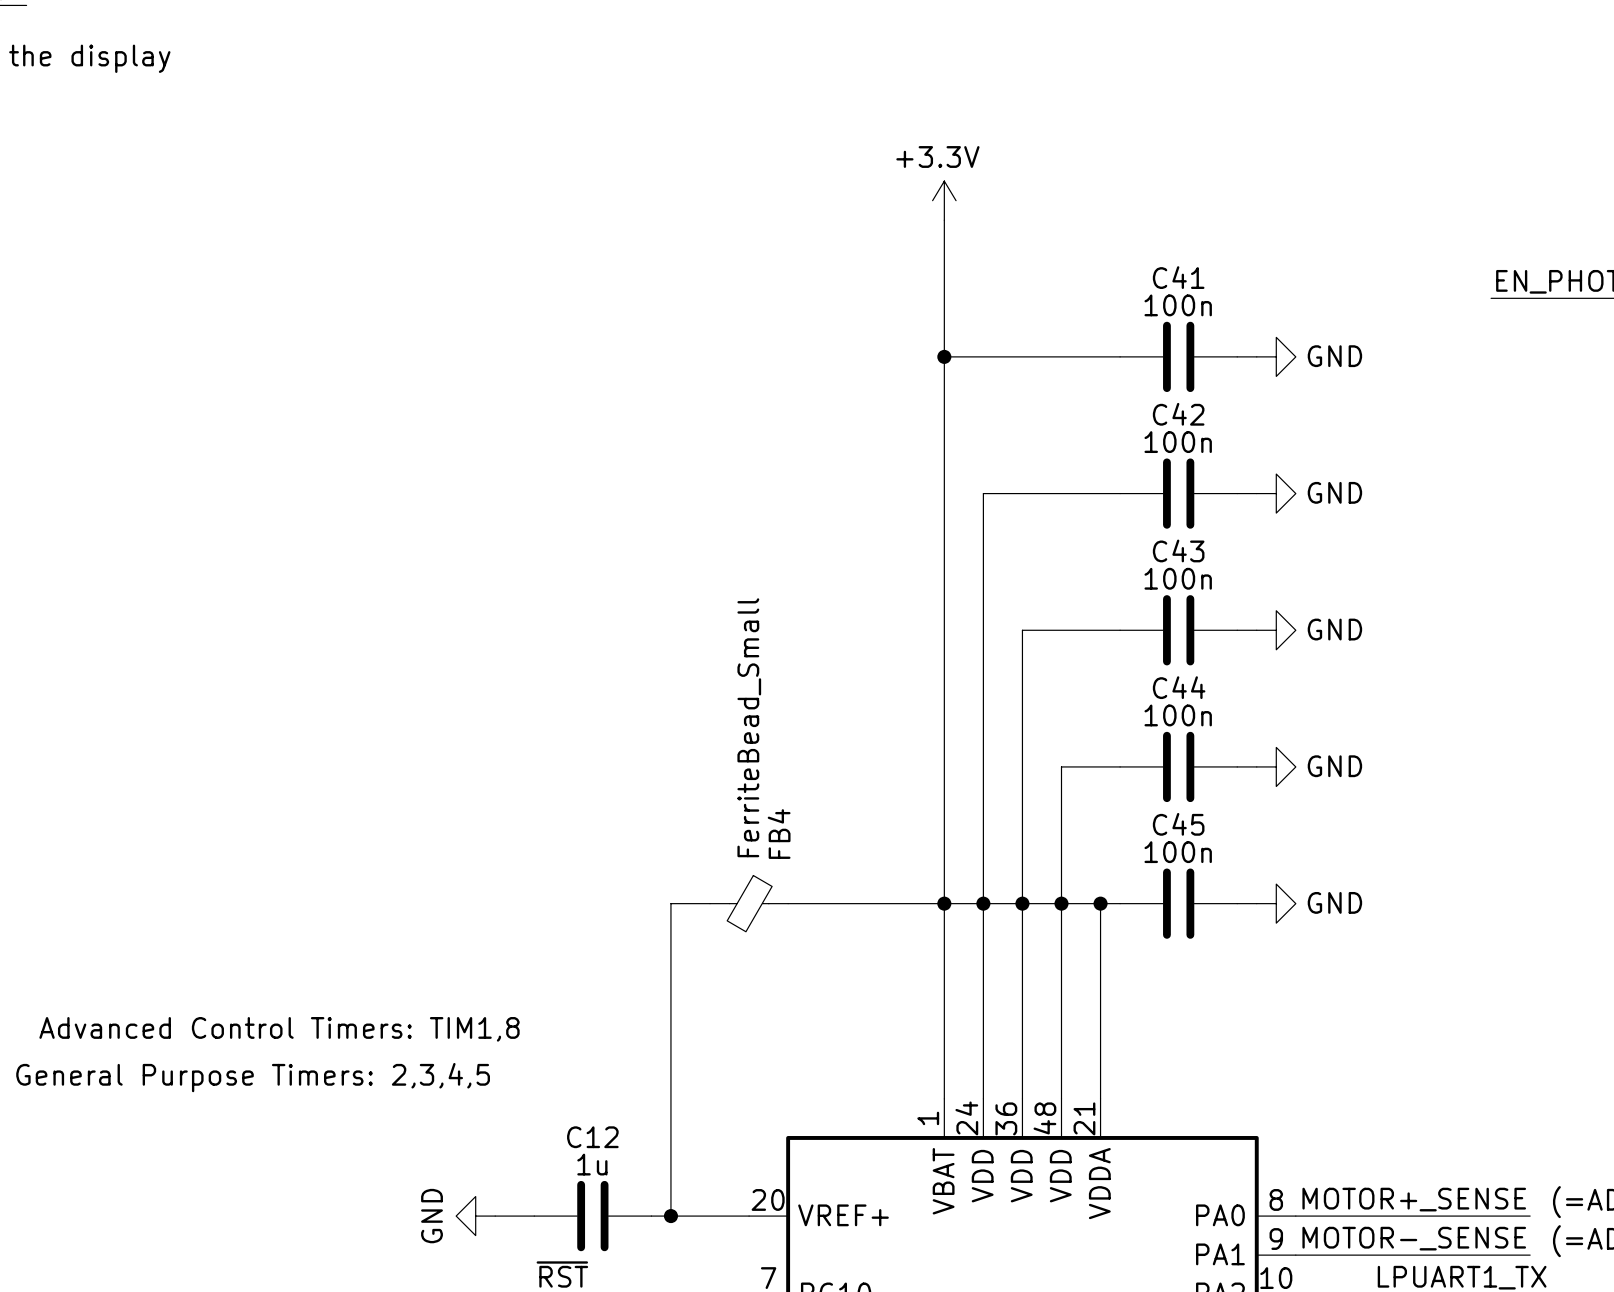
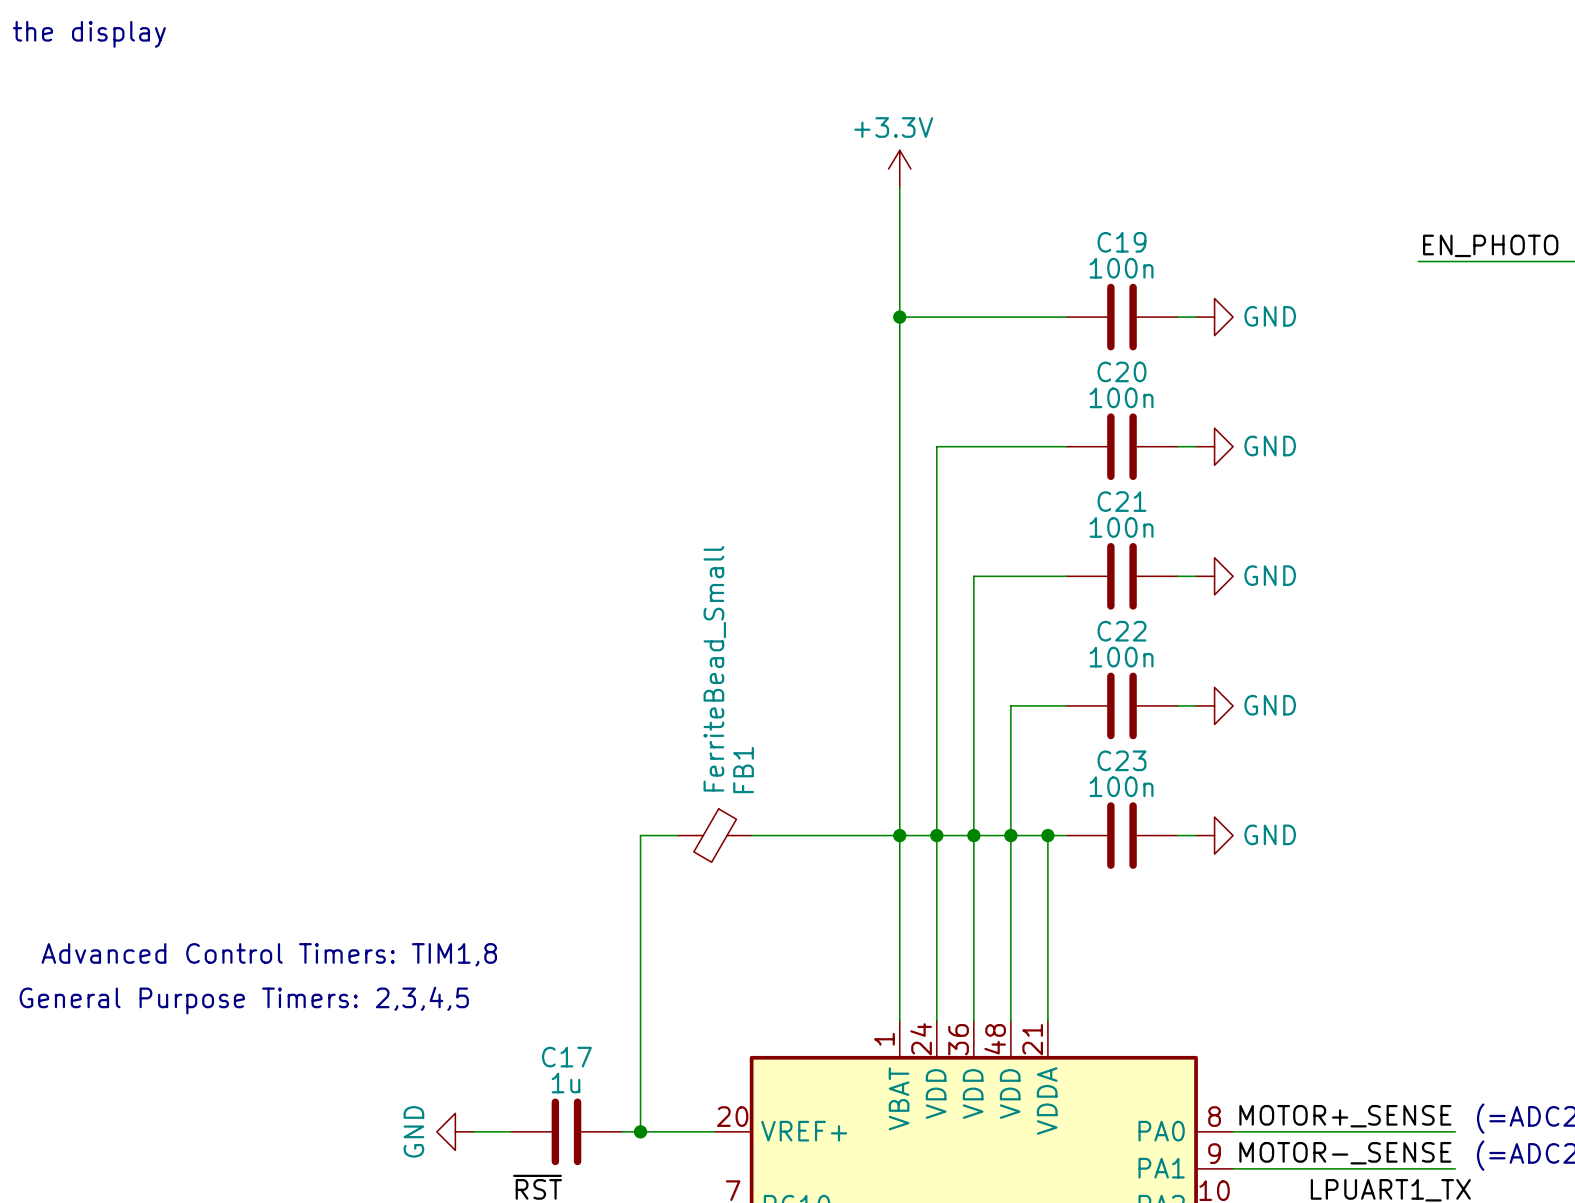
C41 name: C41 (1178, 277) -> C19 (1121, 242)
C42 name: C42 (1178, 414) -> C20 (1121, 371)
C43 name: C43 (1178, 550) -> C21 (1121, 501)
C44 name: C44 (1179, 687) -> C22 (1121, 631)
C45 name: C45 (1178, 824) -> C23 (1121, 760)
FB4 name: FB4 (779, 834) -> FB1 (743, 770)
C12 name: C12 (592, 1137) -> C17 (566, 1057)

